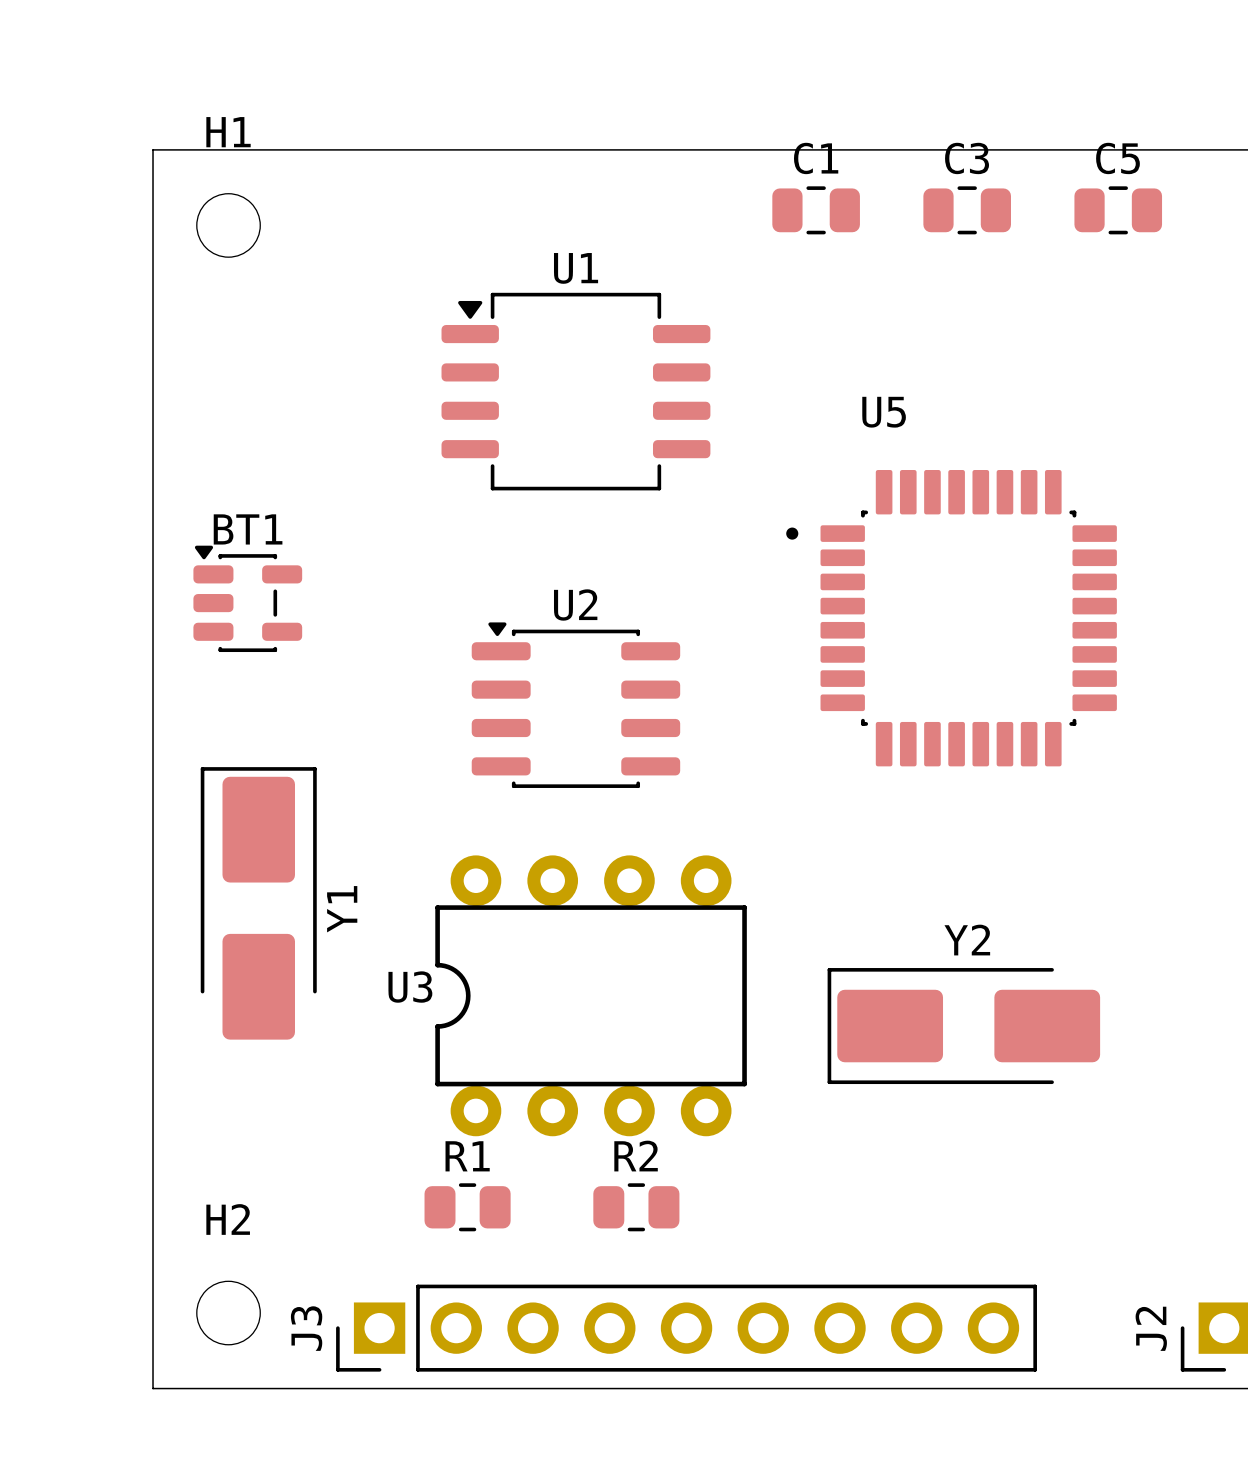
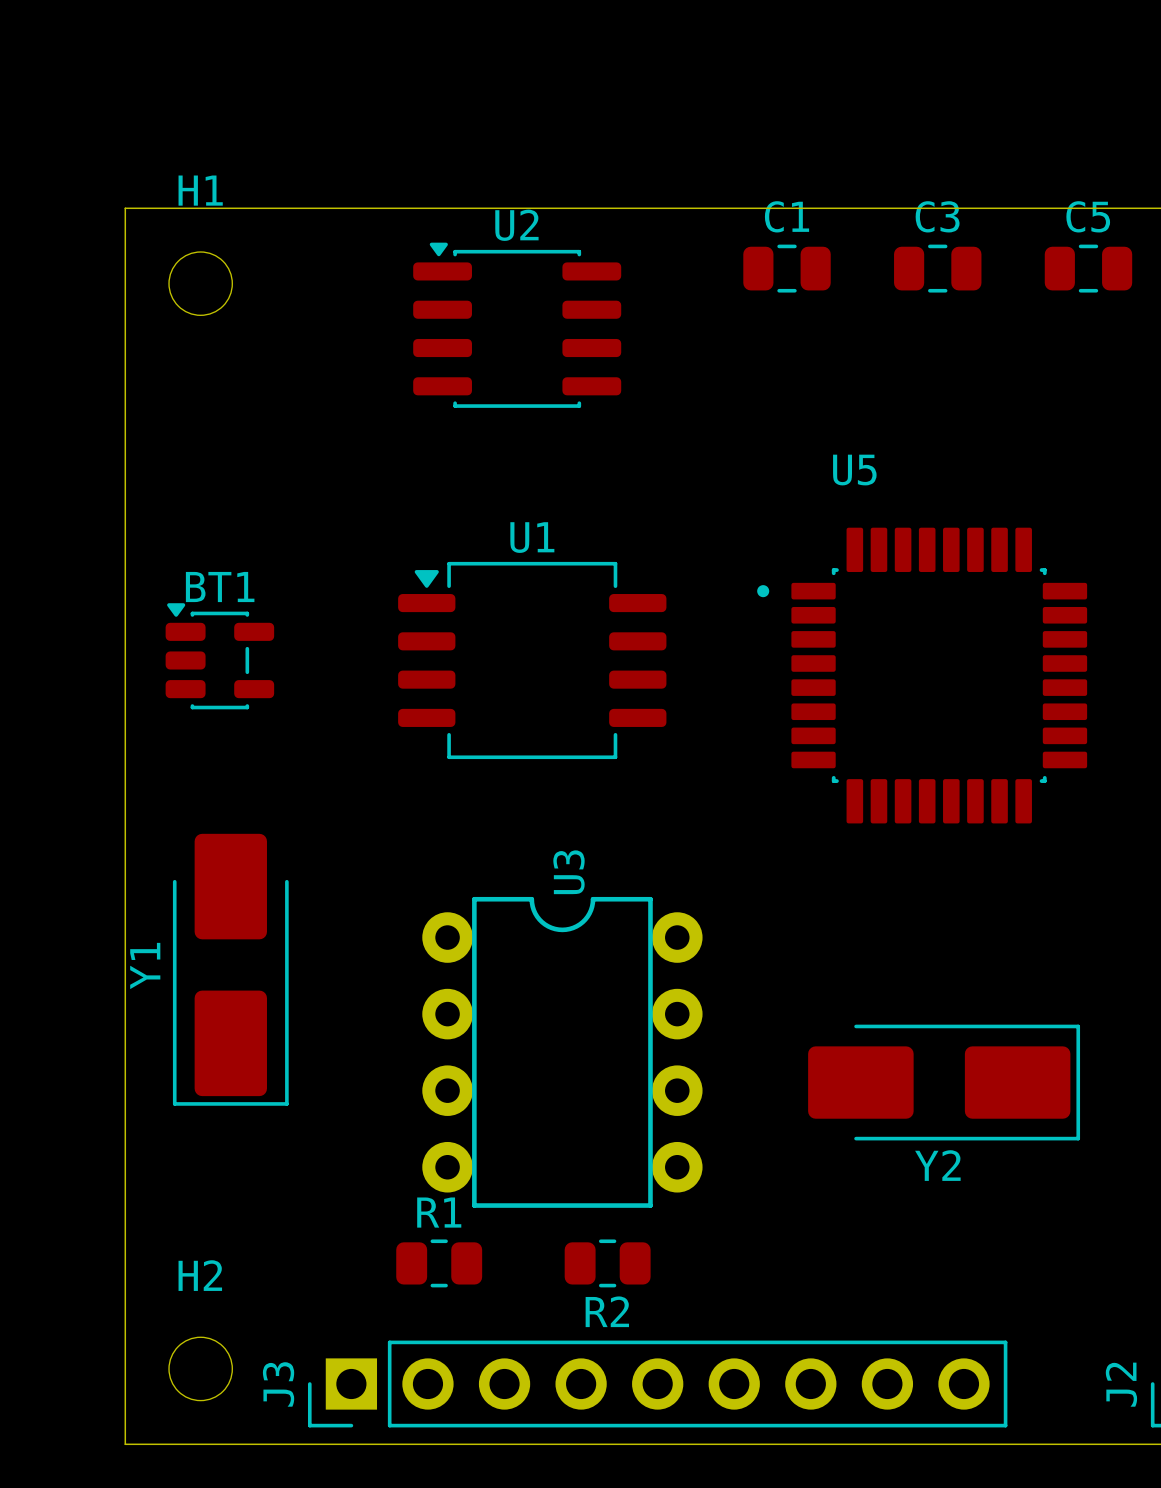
U1 position: (575, 391) -> (532, 660)
U2 position: (575, 705) -> (517, 325)
Y1 rotation: 0° (258, 903) -> 180° (230, 969)
U3 rotation: 0° (591, 995) -> 90° clockwise (562, 1052)
Y2 rotation: 0° (963, 1026) -> 180° (944, 1082)
R2 name position: R2 (636, 1156) -> R2 (607, 1311)

